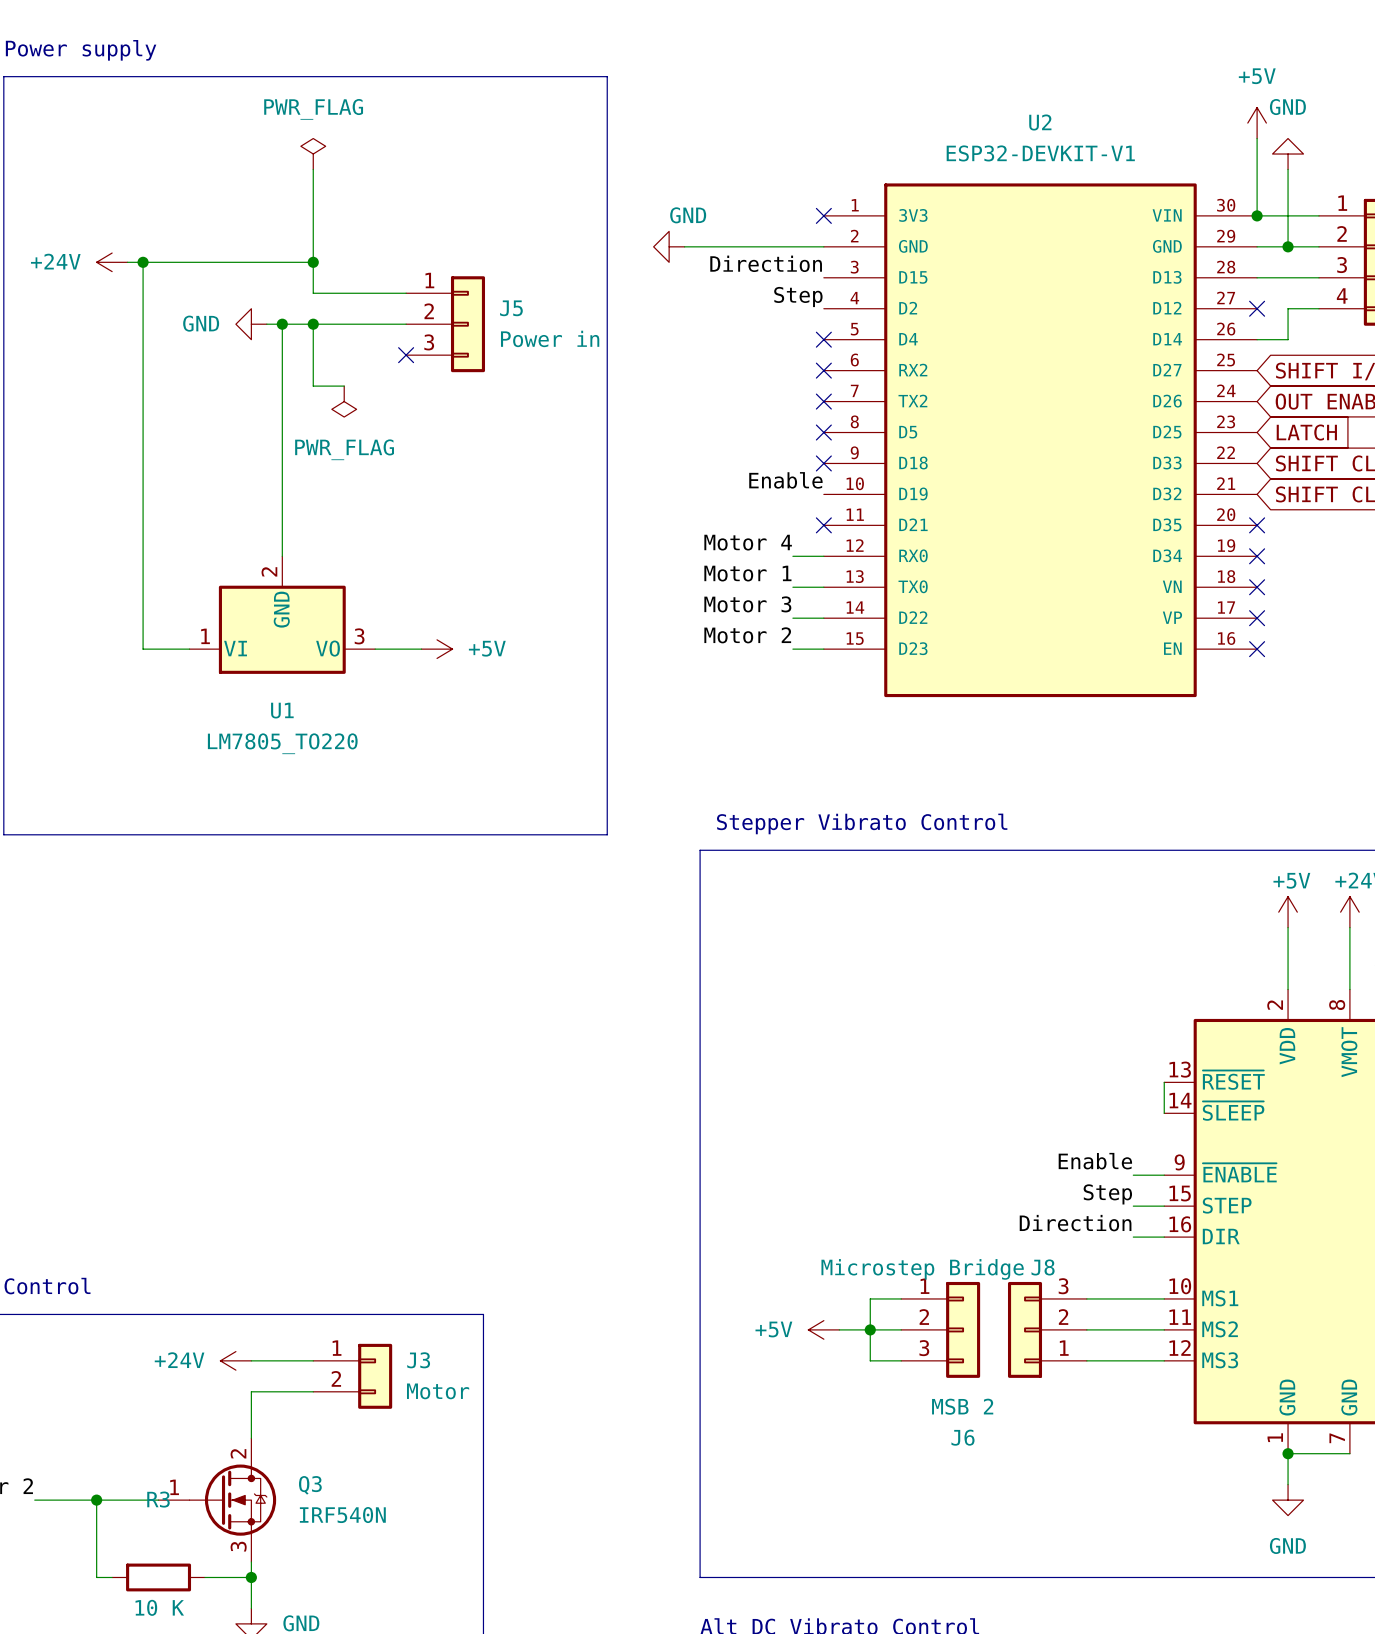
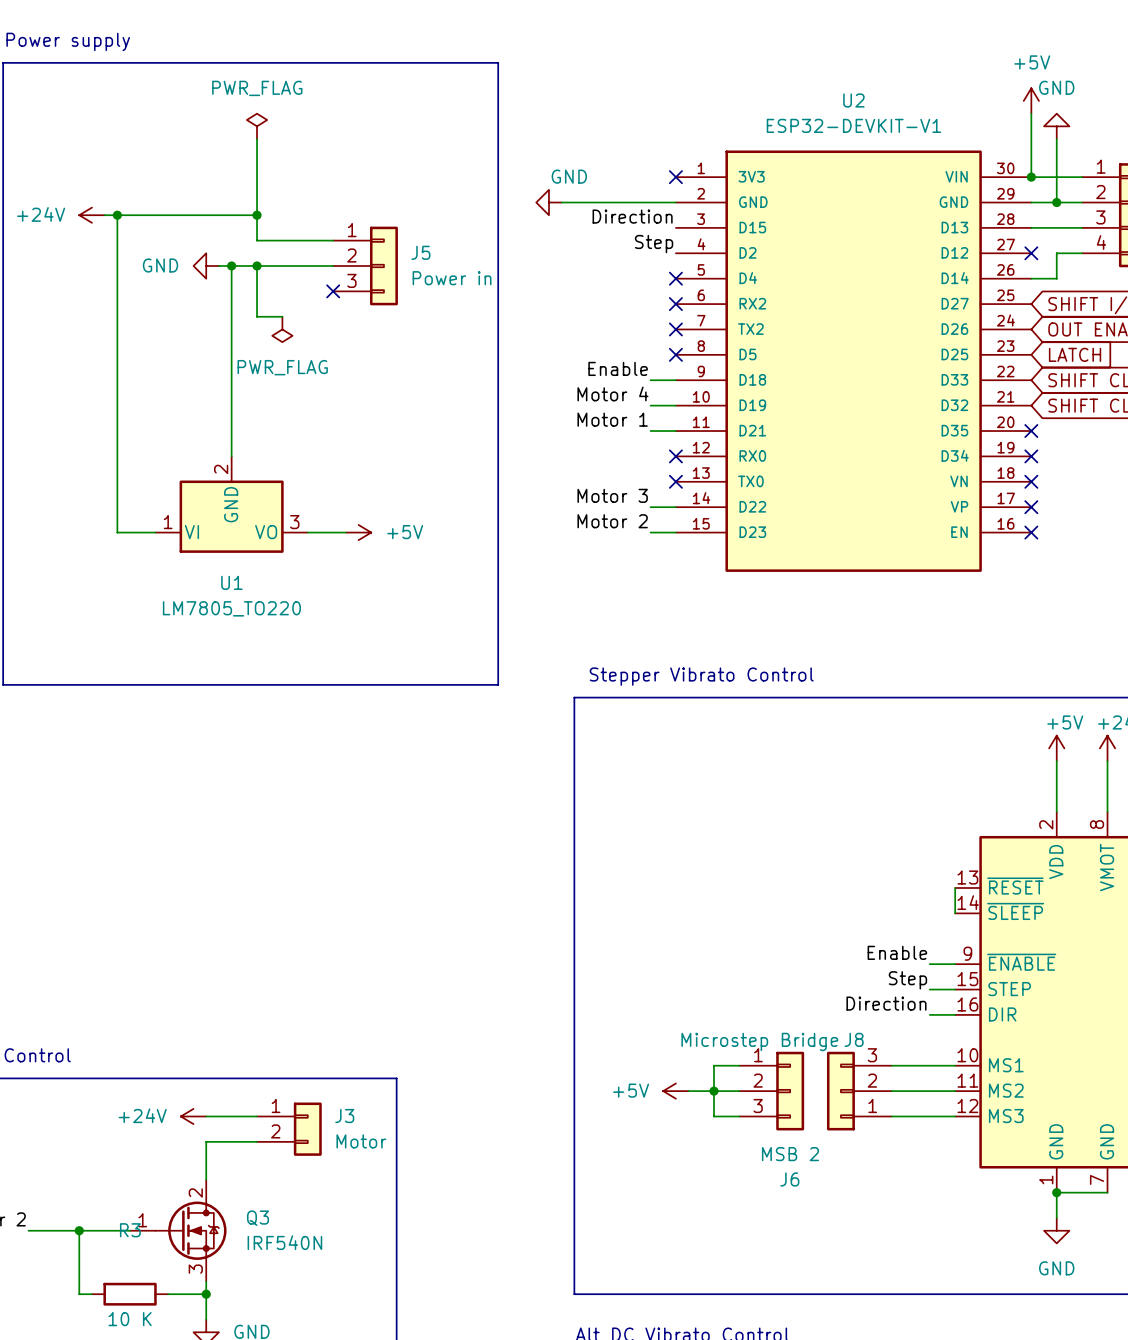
wire: none -> (650, 380) (675, 380)
no-connect mark: (823, 463) -> none
label position: Enable (785, 480) -> Enable (618, 368)
no-connect mark: (823, 525) -> none
label position: Motor 4 (748, 542) -> Motor 4 (612, 393)
wire: (792, 556) (823, 556) -> (650, 405) (675, 405)
no-connect mark: none -> (675, 456)
label position: Motor 1 (747, 573) -> Motor 1 (612, 419)
wire: (792, 587) (823, 587) -> (650, 431) (675, 431)
no-connect mark: none -> (675, 481)

